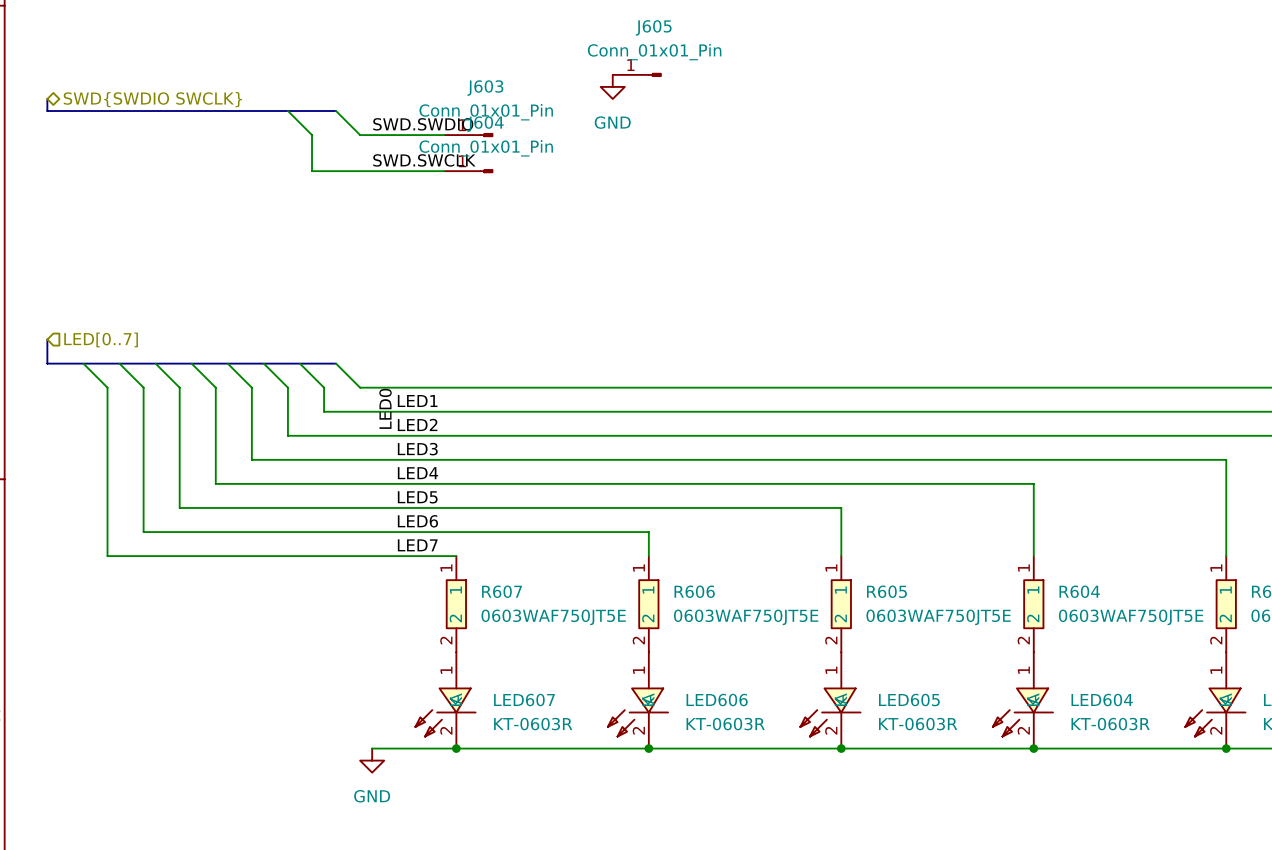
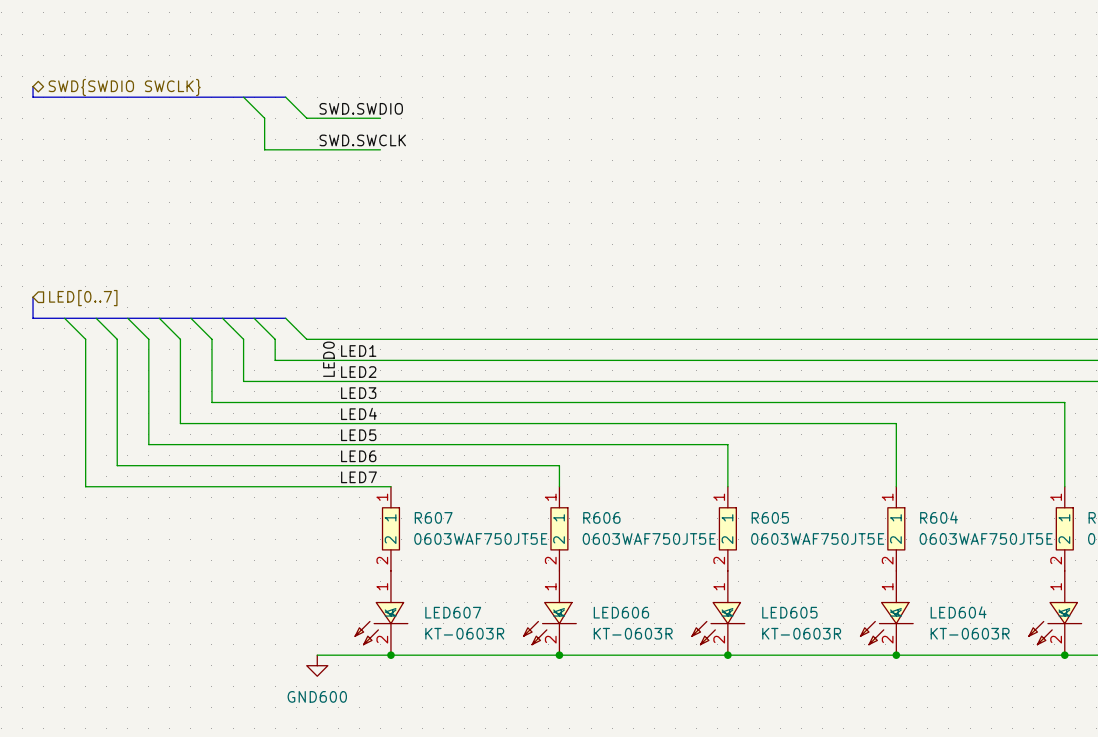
J605: Conn_01x01_Pin (637, 74) -> none
power symbol: GND (612, 86) -> none
J603: Conn_01x01_Pin (468, 135) -> none
J604: Conn_01x01_Pin (468, 171) -> none
power symbol: GND (372, 760) -> GND600 (317, 665)

